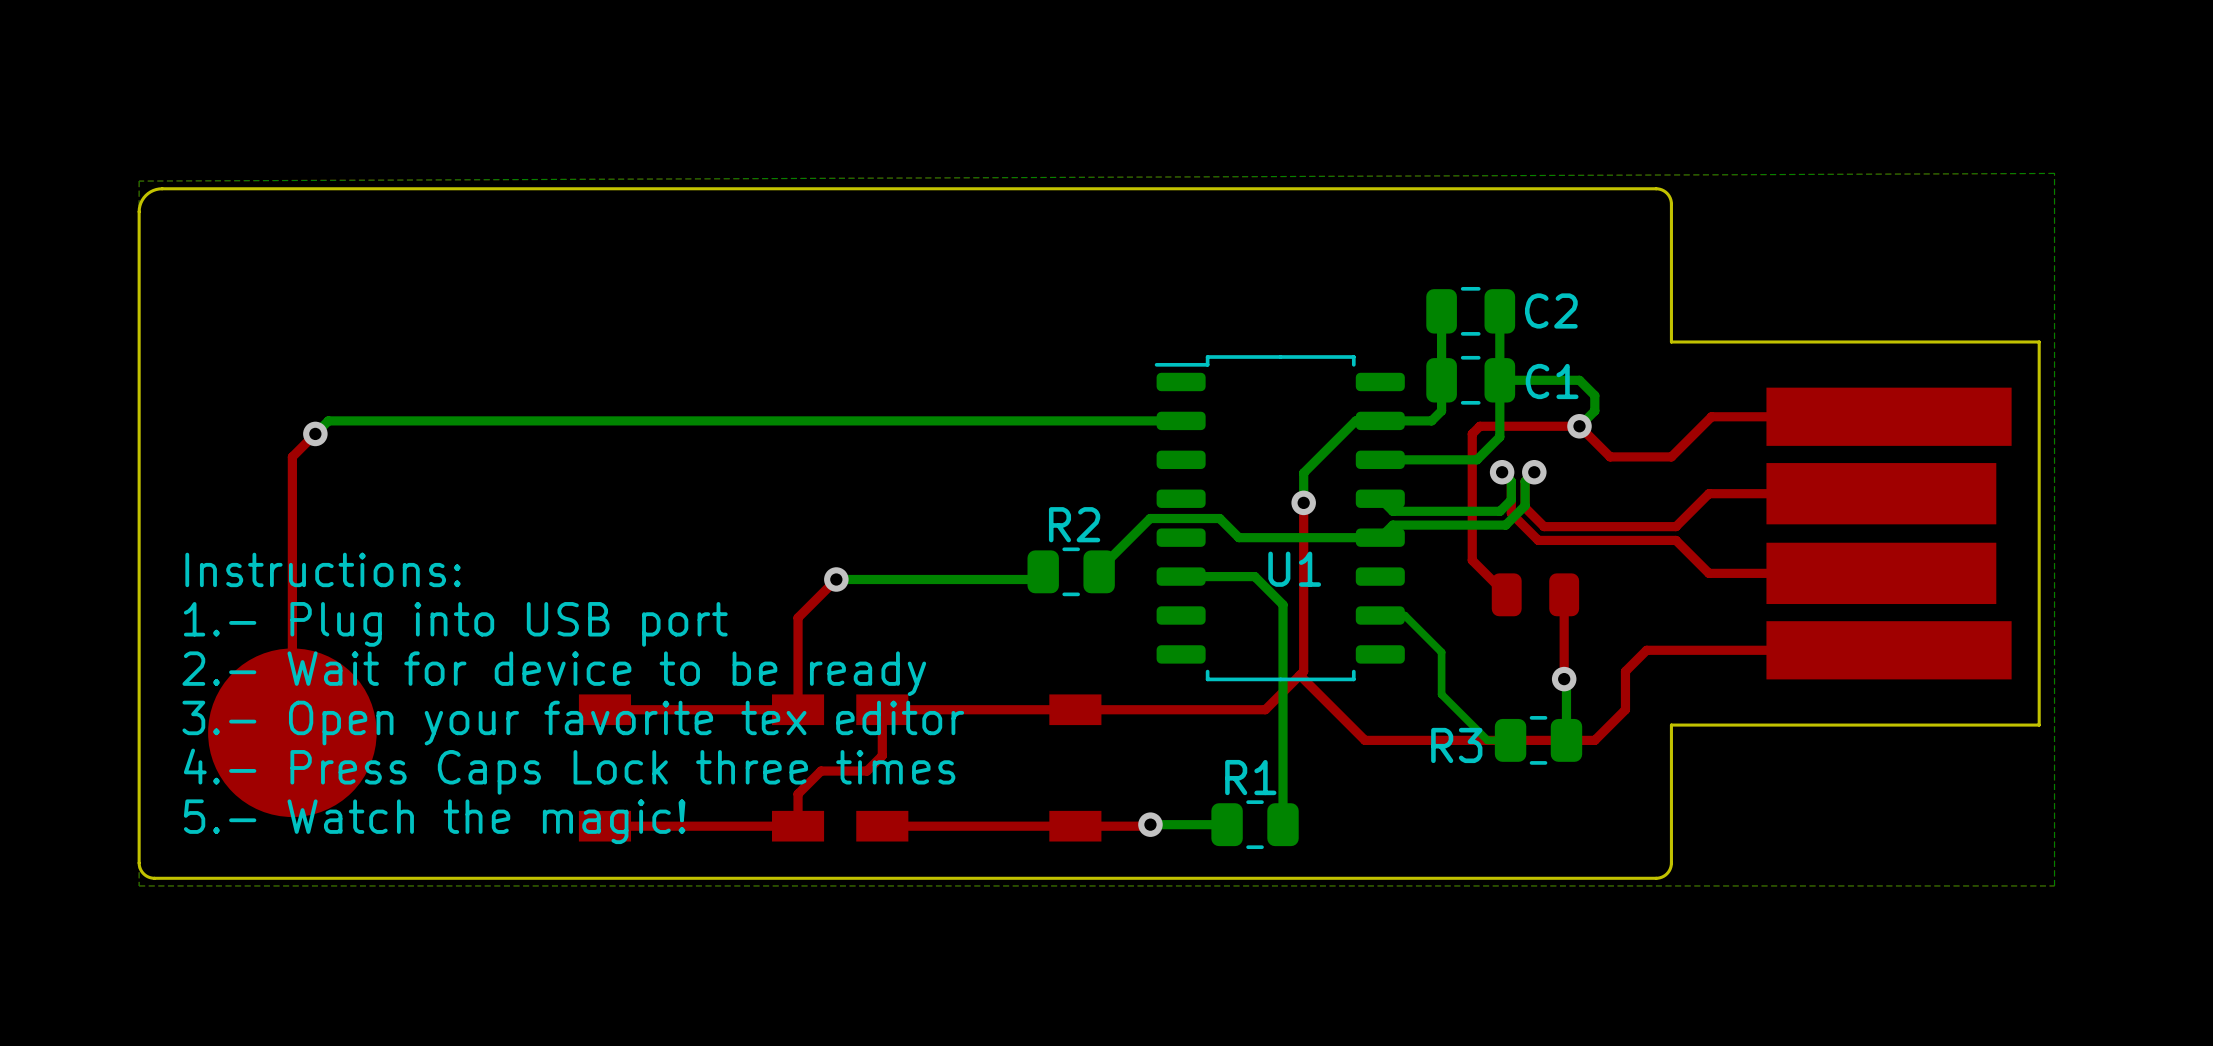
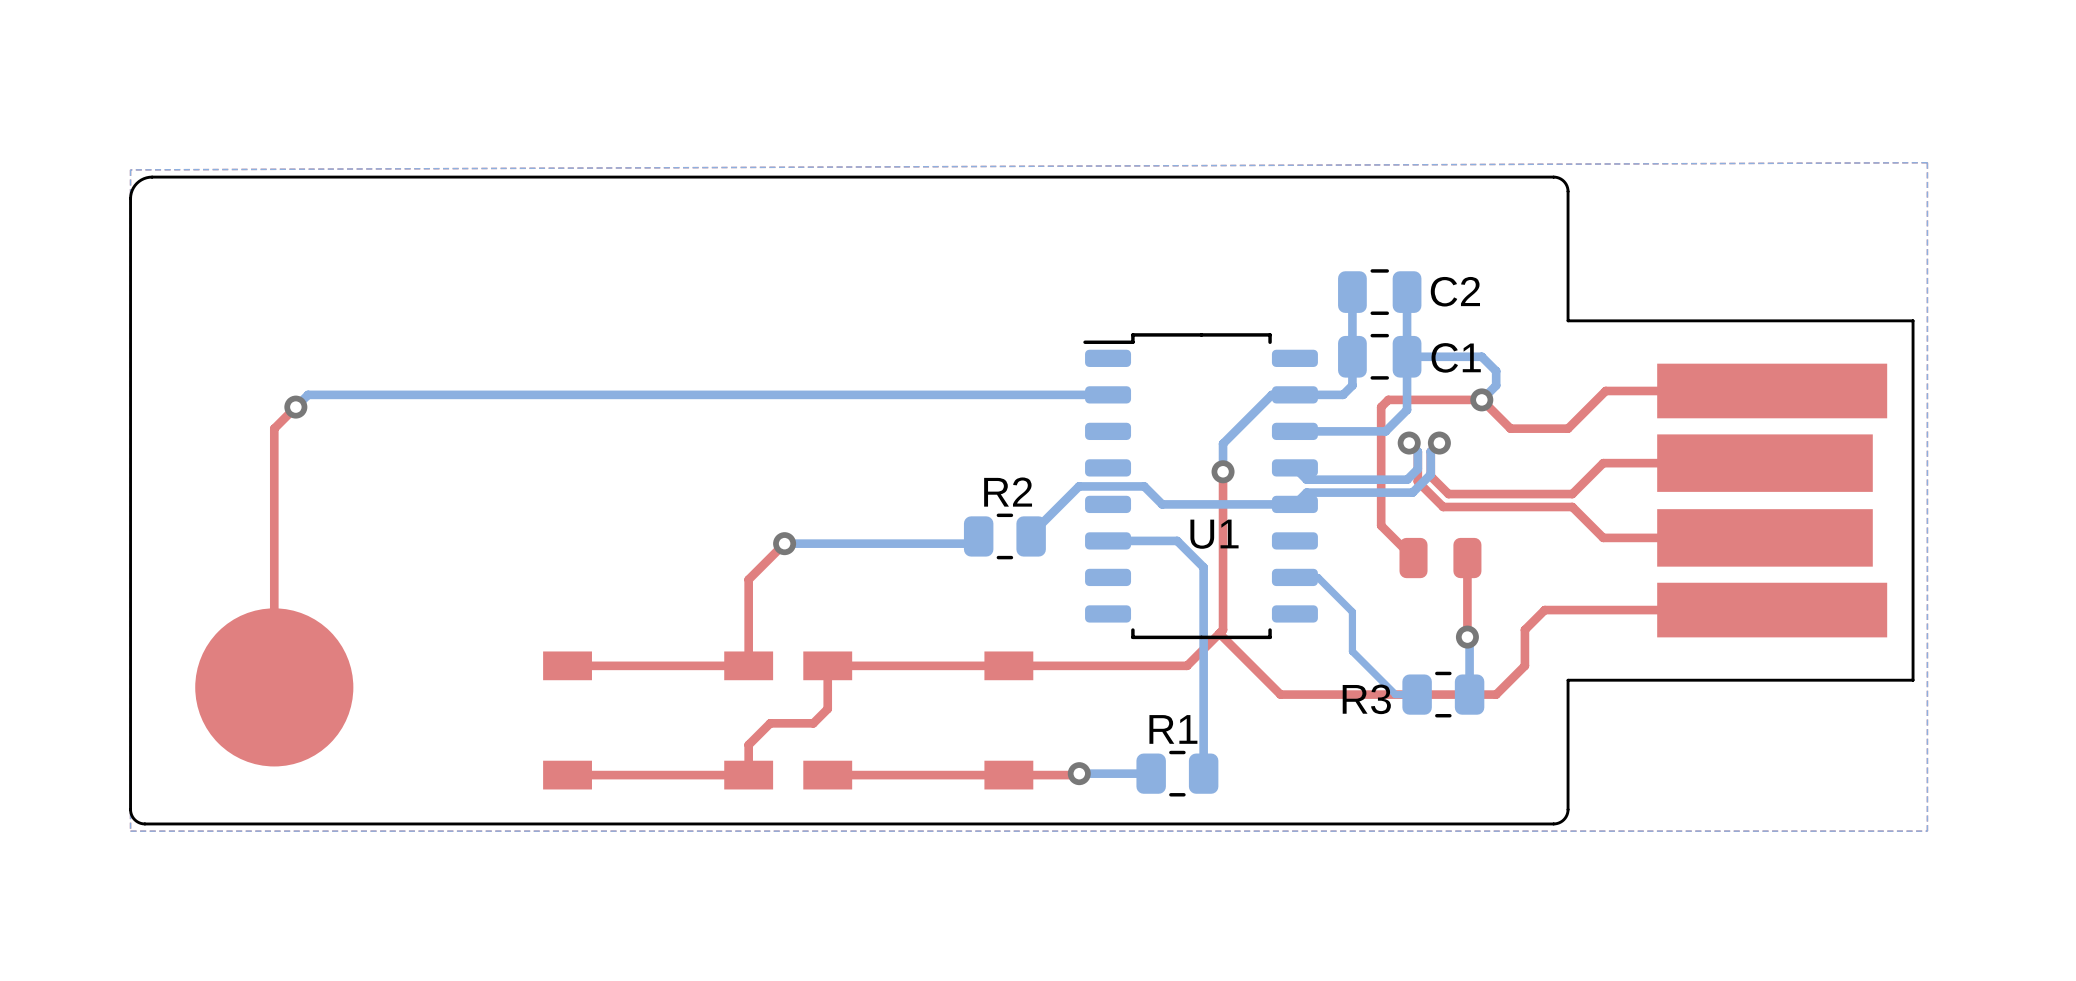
text: Instructions: (322, 569) -> none
text: 1.- Plug into USB port (455, 624) -> none
text: 2.- Wait for device to be ready (554, 673) -> none
text: 3.- Open your favorite tex editor (573, 723) -> none
text: 4.- Press Caps Lock three times (569, 771) -> none
text: 5.- Watch the magic! (434, 821) -> none

